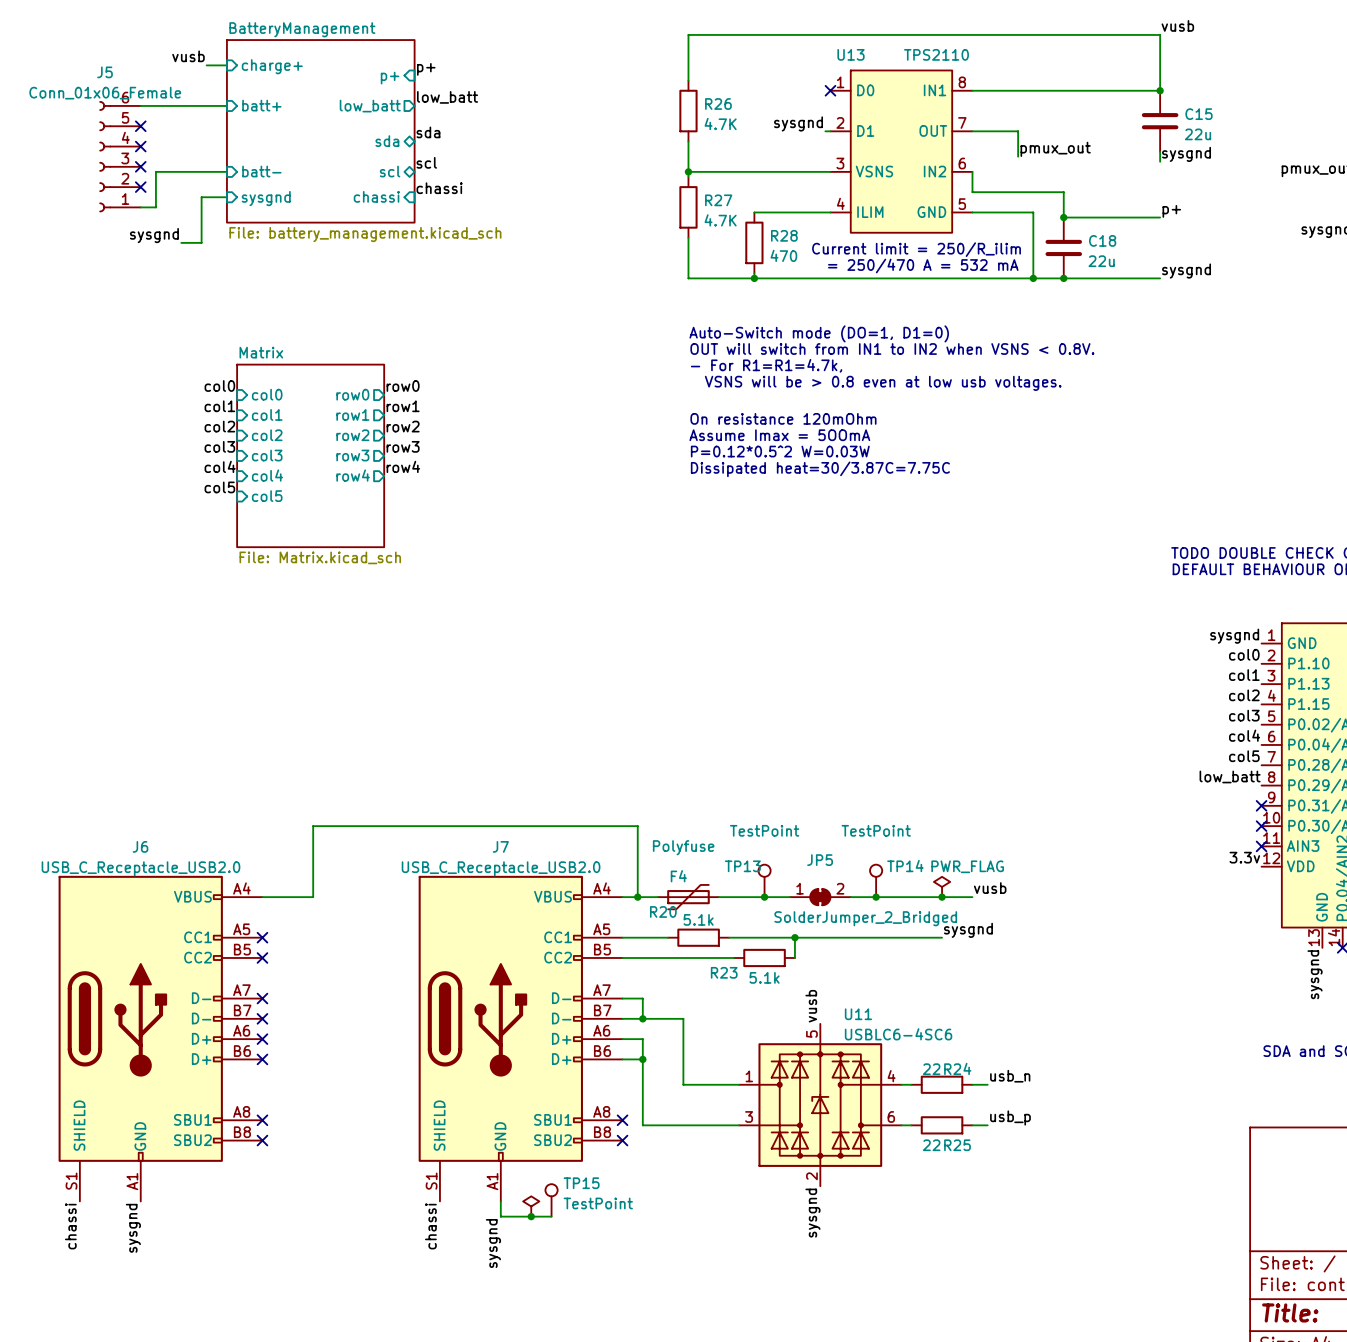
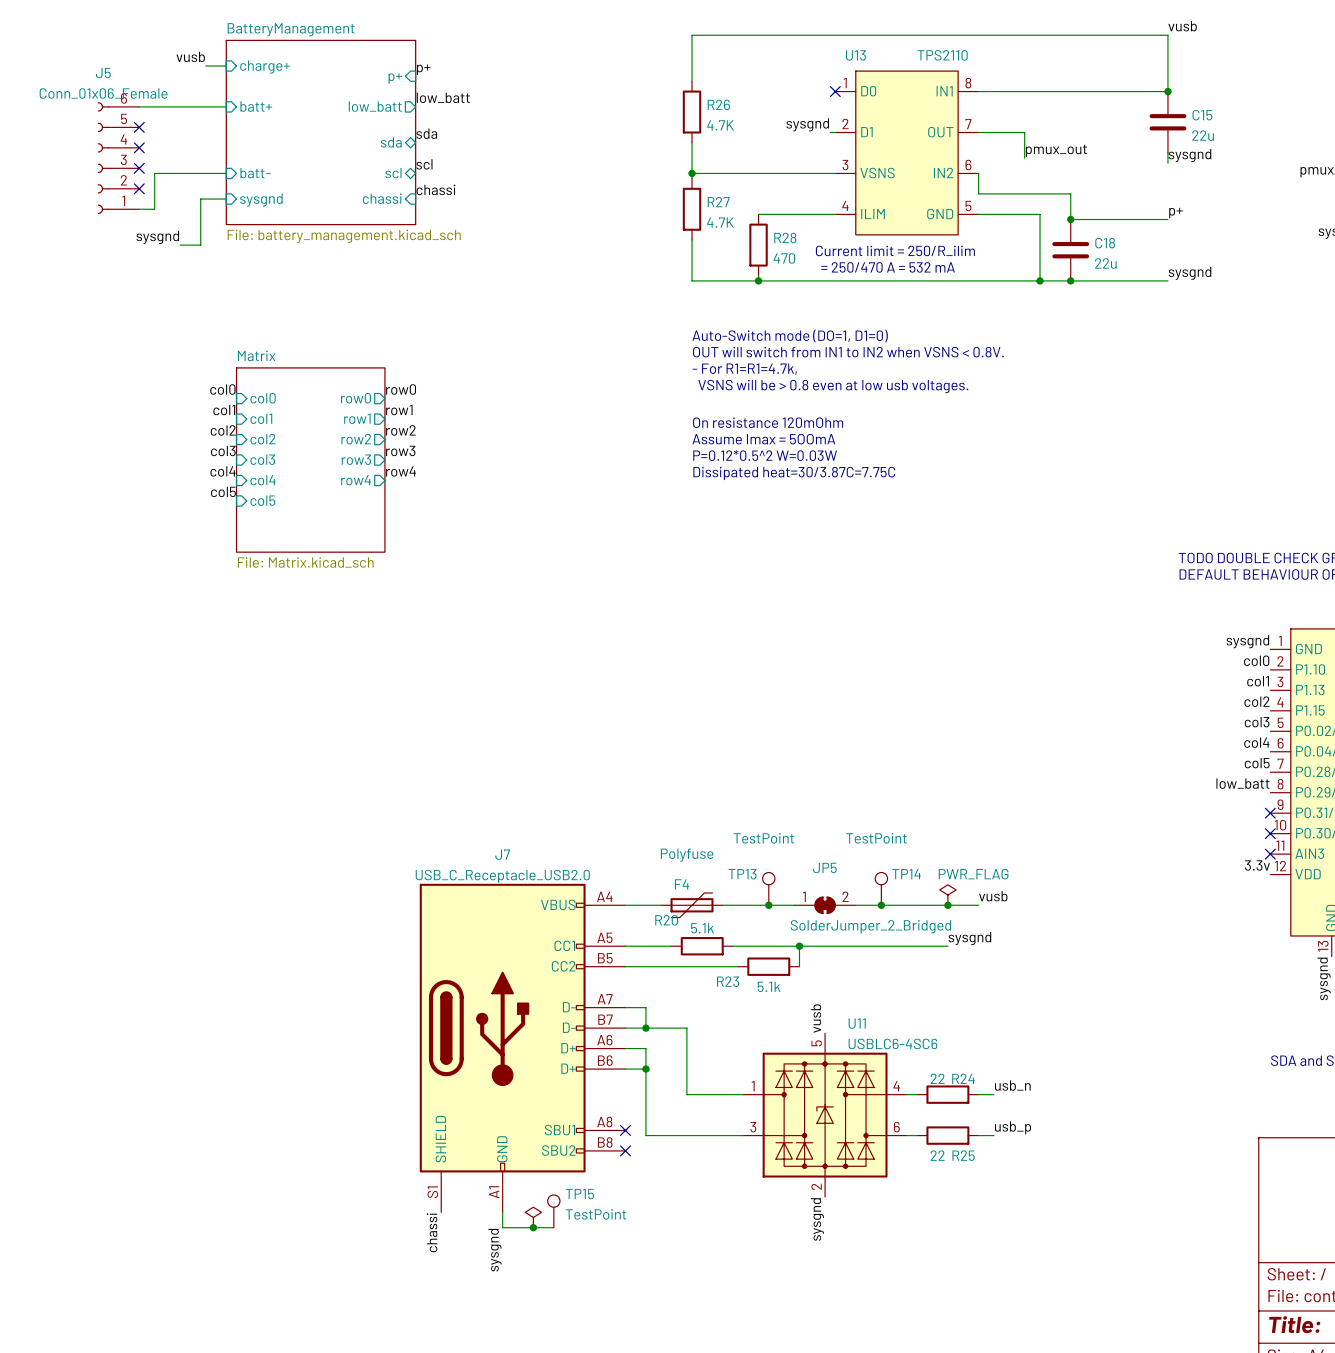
wire: (262, 897) (313, 897) (313, 826) (637, 826) (637, 897) -> none
junction: (637, 897) -> none
no-connect mark: (262, 937) -> none
no-connect mark: (262, 957) -> none
no-connect mark: (262, 998) -> none
no-connect mark: (262, 1018) -> none
J6: USB_C_Receptacle_USB2.0 (160, 1038) -> none
no-connect mark: (262, 1039) -> none
no-connect mark: (262, 1059) -> none
no-connect mark: (262, 1120) -> none
no-connect mark: (262, 1140) -> none
label: chassi (70, 1226) -> none
label: sysgnd (133, 1228) -> none

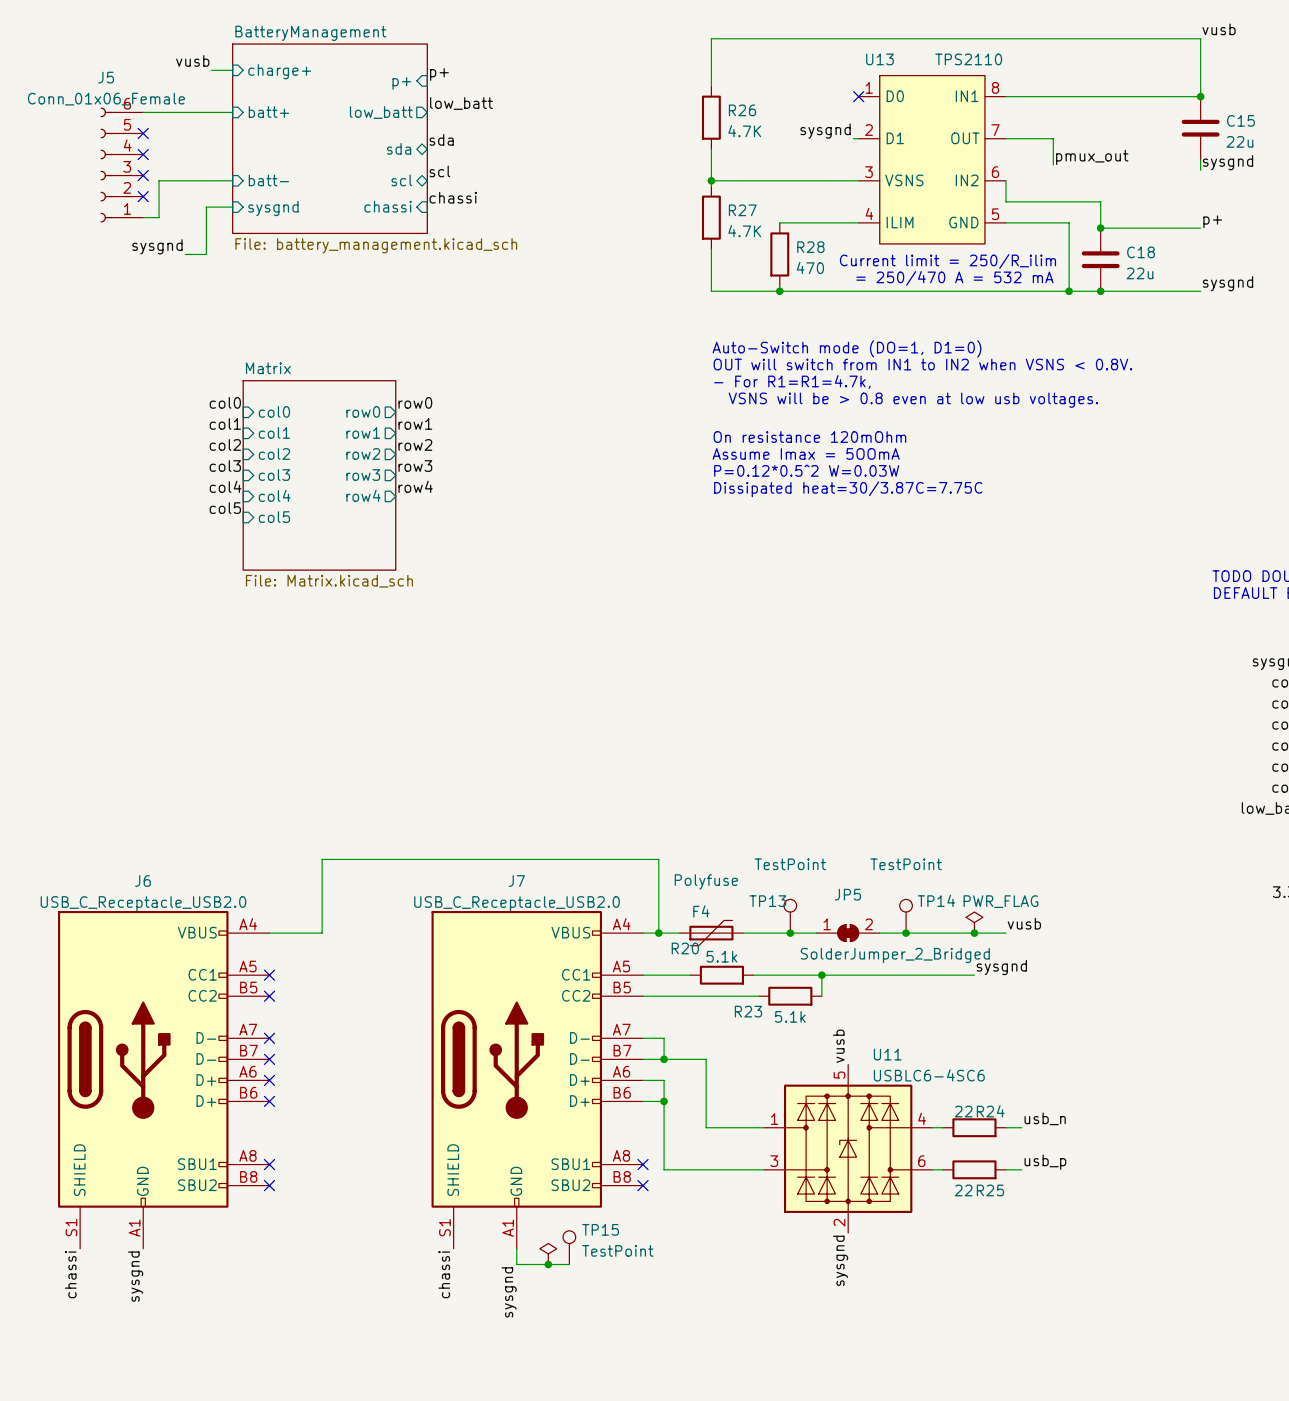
wire: none -> (269, 933) (322, 933) (322, 859) (658, 859) (658, 933)
junction: none -> (658, 933)
no-connect mark: none -> (269, 975)
no-connect mark: none -> (269, 996)
no-connect mark: none -> (269, 1038)
no-connect mark: none -> (269, 1059)
J6: none -> USB_C_Receptacle_USB2.0 (163, 1079)
no-connect mark: none -> (269, 1080)
no-connect mark: none -> (269, 1101)
no-connect mark: none -> (269, 1164)
no-connect mark: none -> (269, 1185)
label: none -> chassi (70, 1274)
label: none -> sysgnd (135, 1276)

